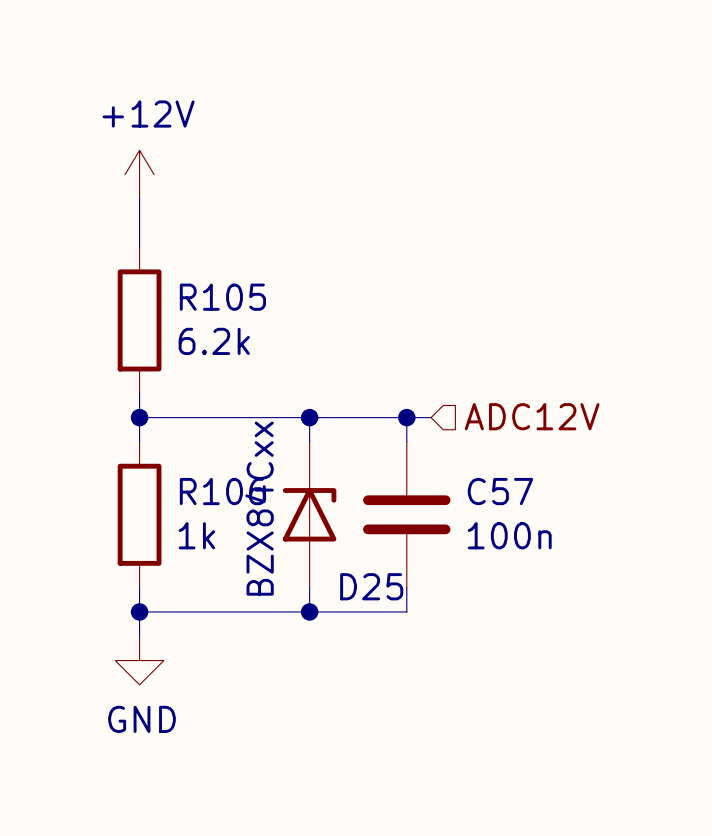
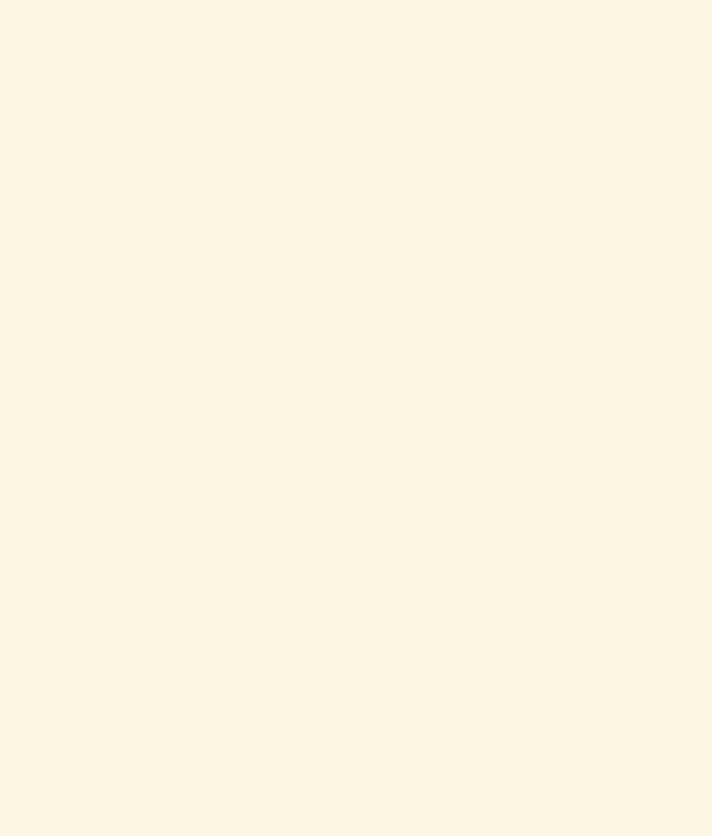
power symbol: +12V (139, 174) -> none
wire: (139, 198) (139, 247) -> none
R105: 6.2k (139, 320) -> none
wire: (139, 393) (139, 441) -> none
hierarchical label: ADC12V (532, 416) -> none
wire: (139, 417) (431, 417) -> none
junction: (139, 417) -> none
wire: (309, 417) (309, 441) -> none
junction: (309, 417) -> none
wire: (406, 417) (406, 441) -> none
junction: (406, 417) -> none
R106: 1k (139, 514) -> none
D25: BZX84Cxx (309, 514) -> none
C57: 100n (406, 514) -> none
wire: (139, 587) (139, 636) -> none
wire: (309, 587) (309, 611) -> none
wire: (406, 587) (406, 611) (139, 611) -> none
junction: (139, 611) -> none
junction: (309, 611) -> none
power symbol: GND (139, 660) -> none

